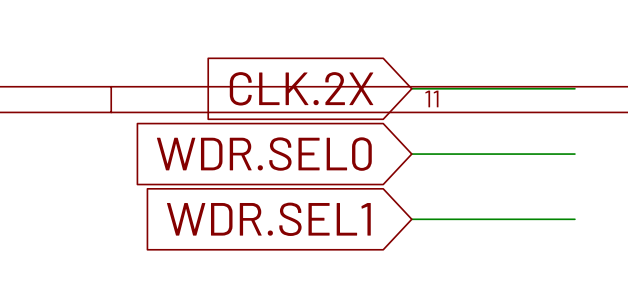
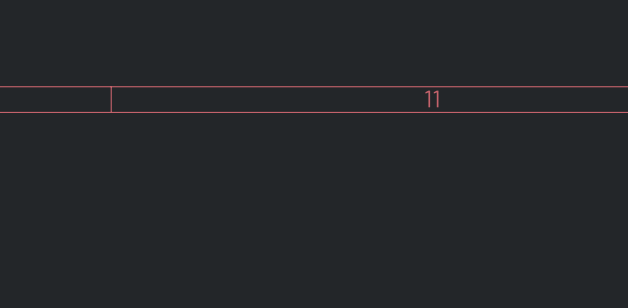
global label: CLK.2X (301, 88) -> none
wire: (411, 88) (574, 88) -> none
global label: WDR.SEL0 (264, 154) -> none
wire: (411, 154) (574, 154) -> none
global label: WDR.SEL1 (268, 219) -> none
wire: (411, 219) (574, 219) -> none

